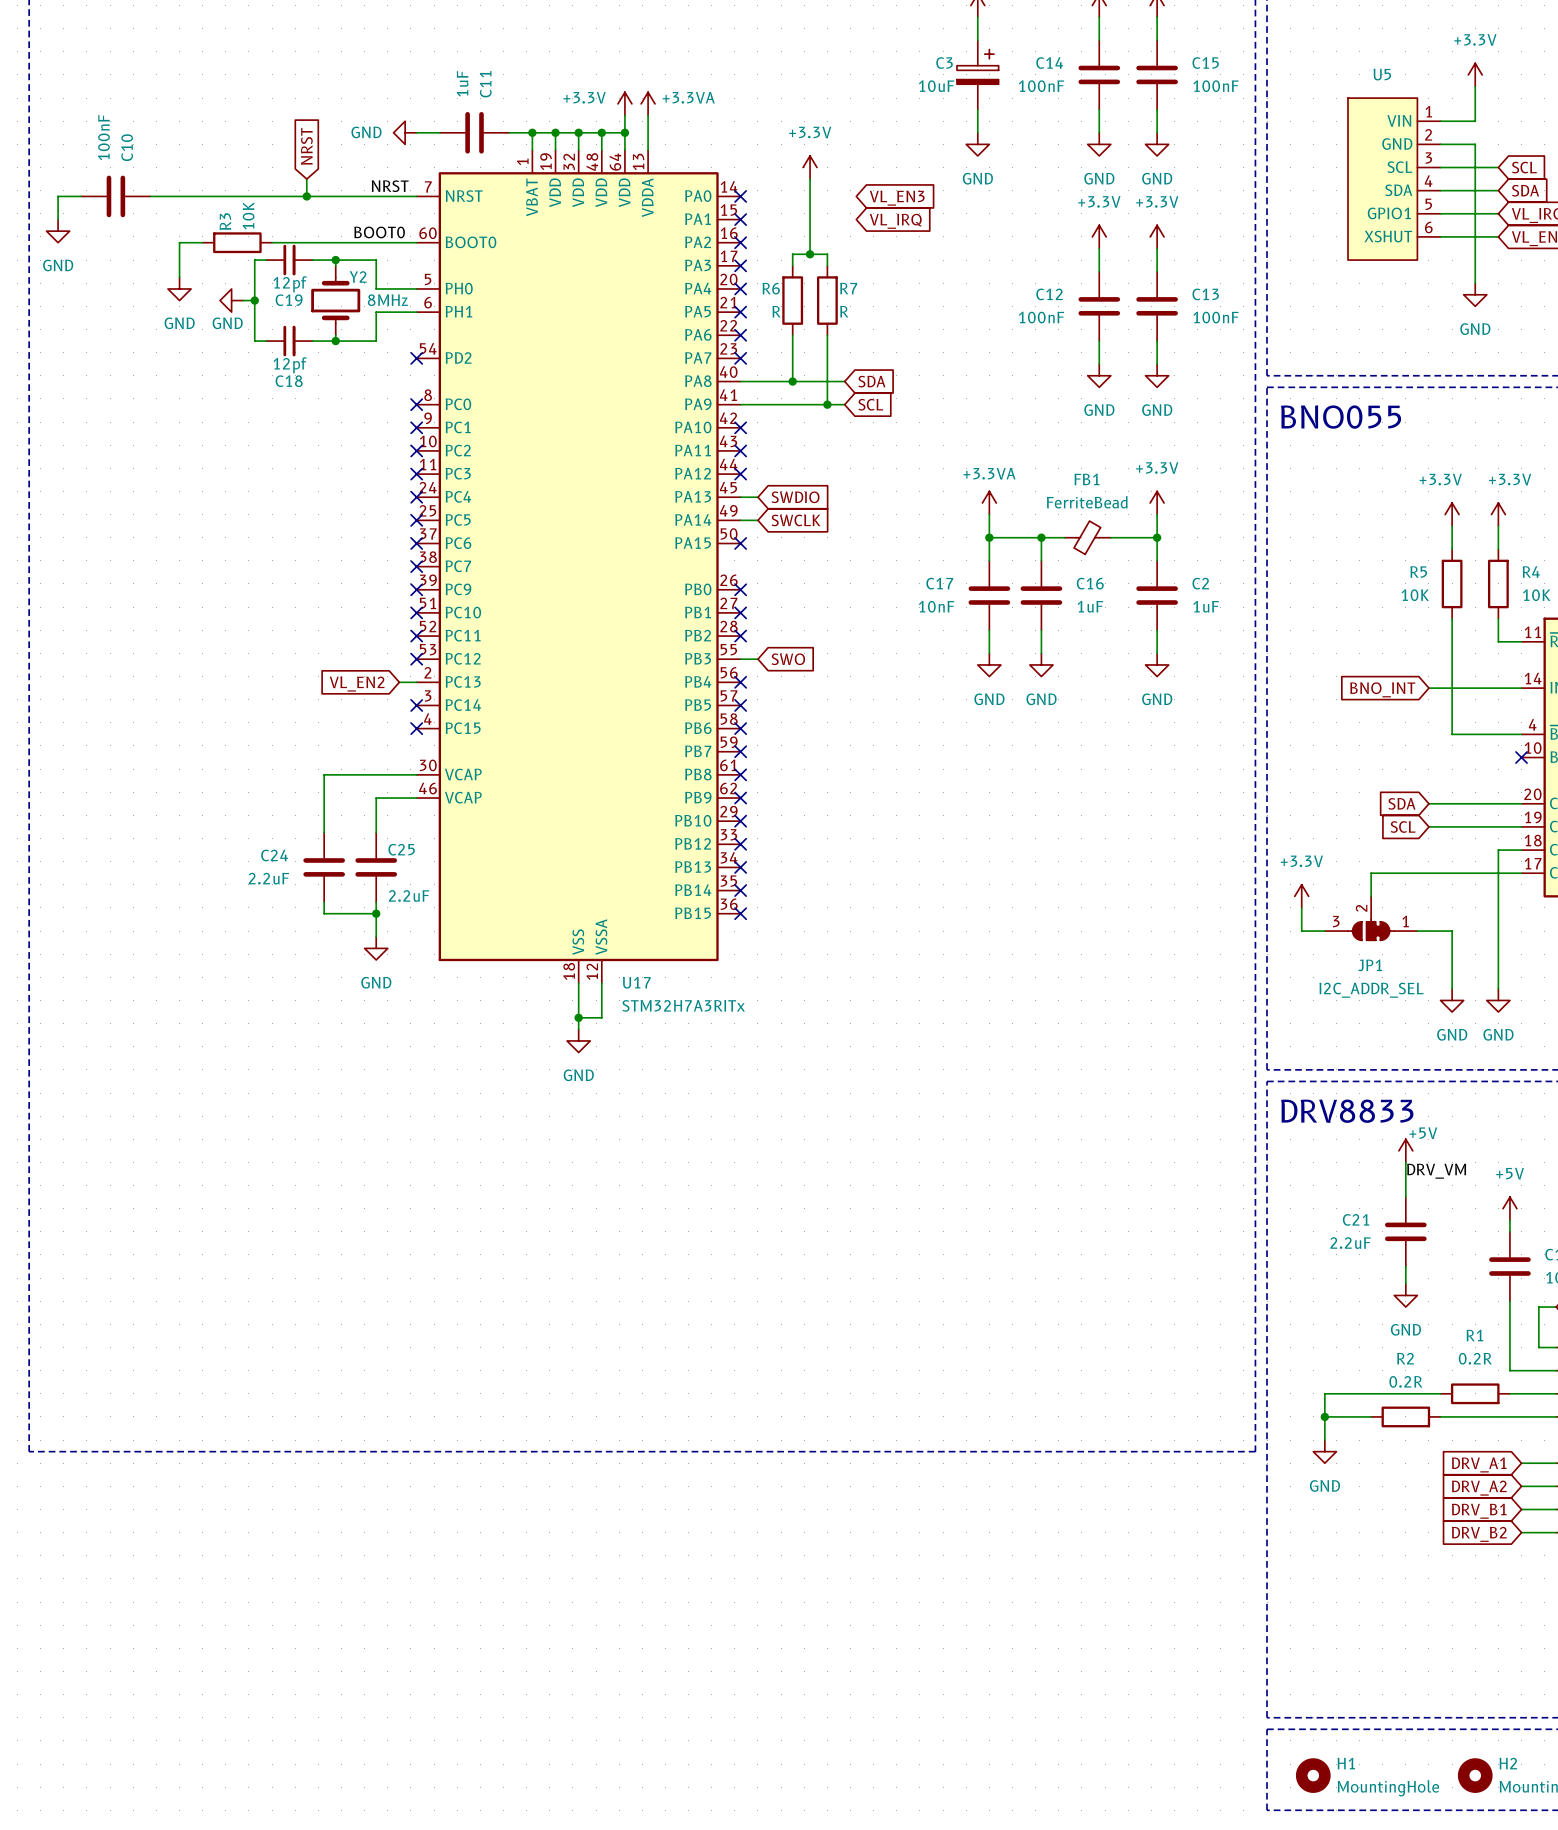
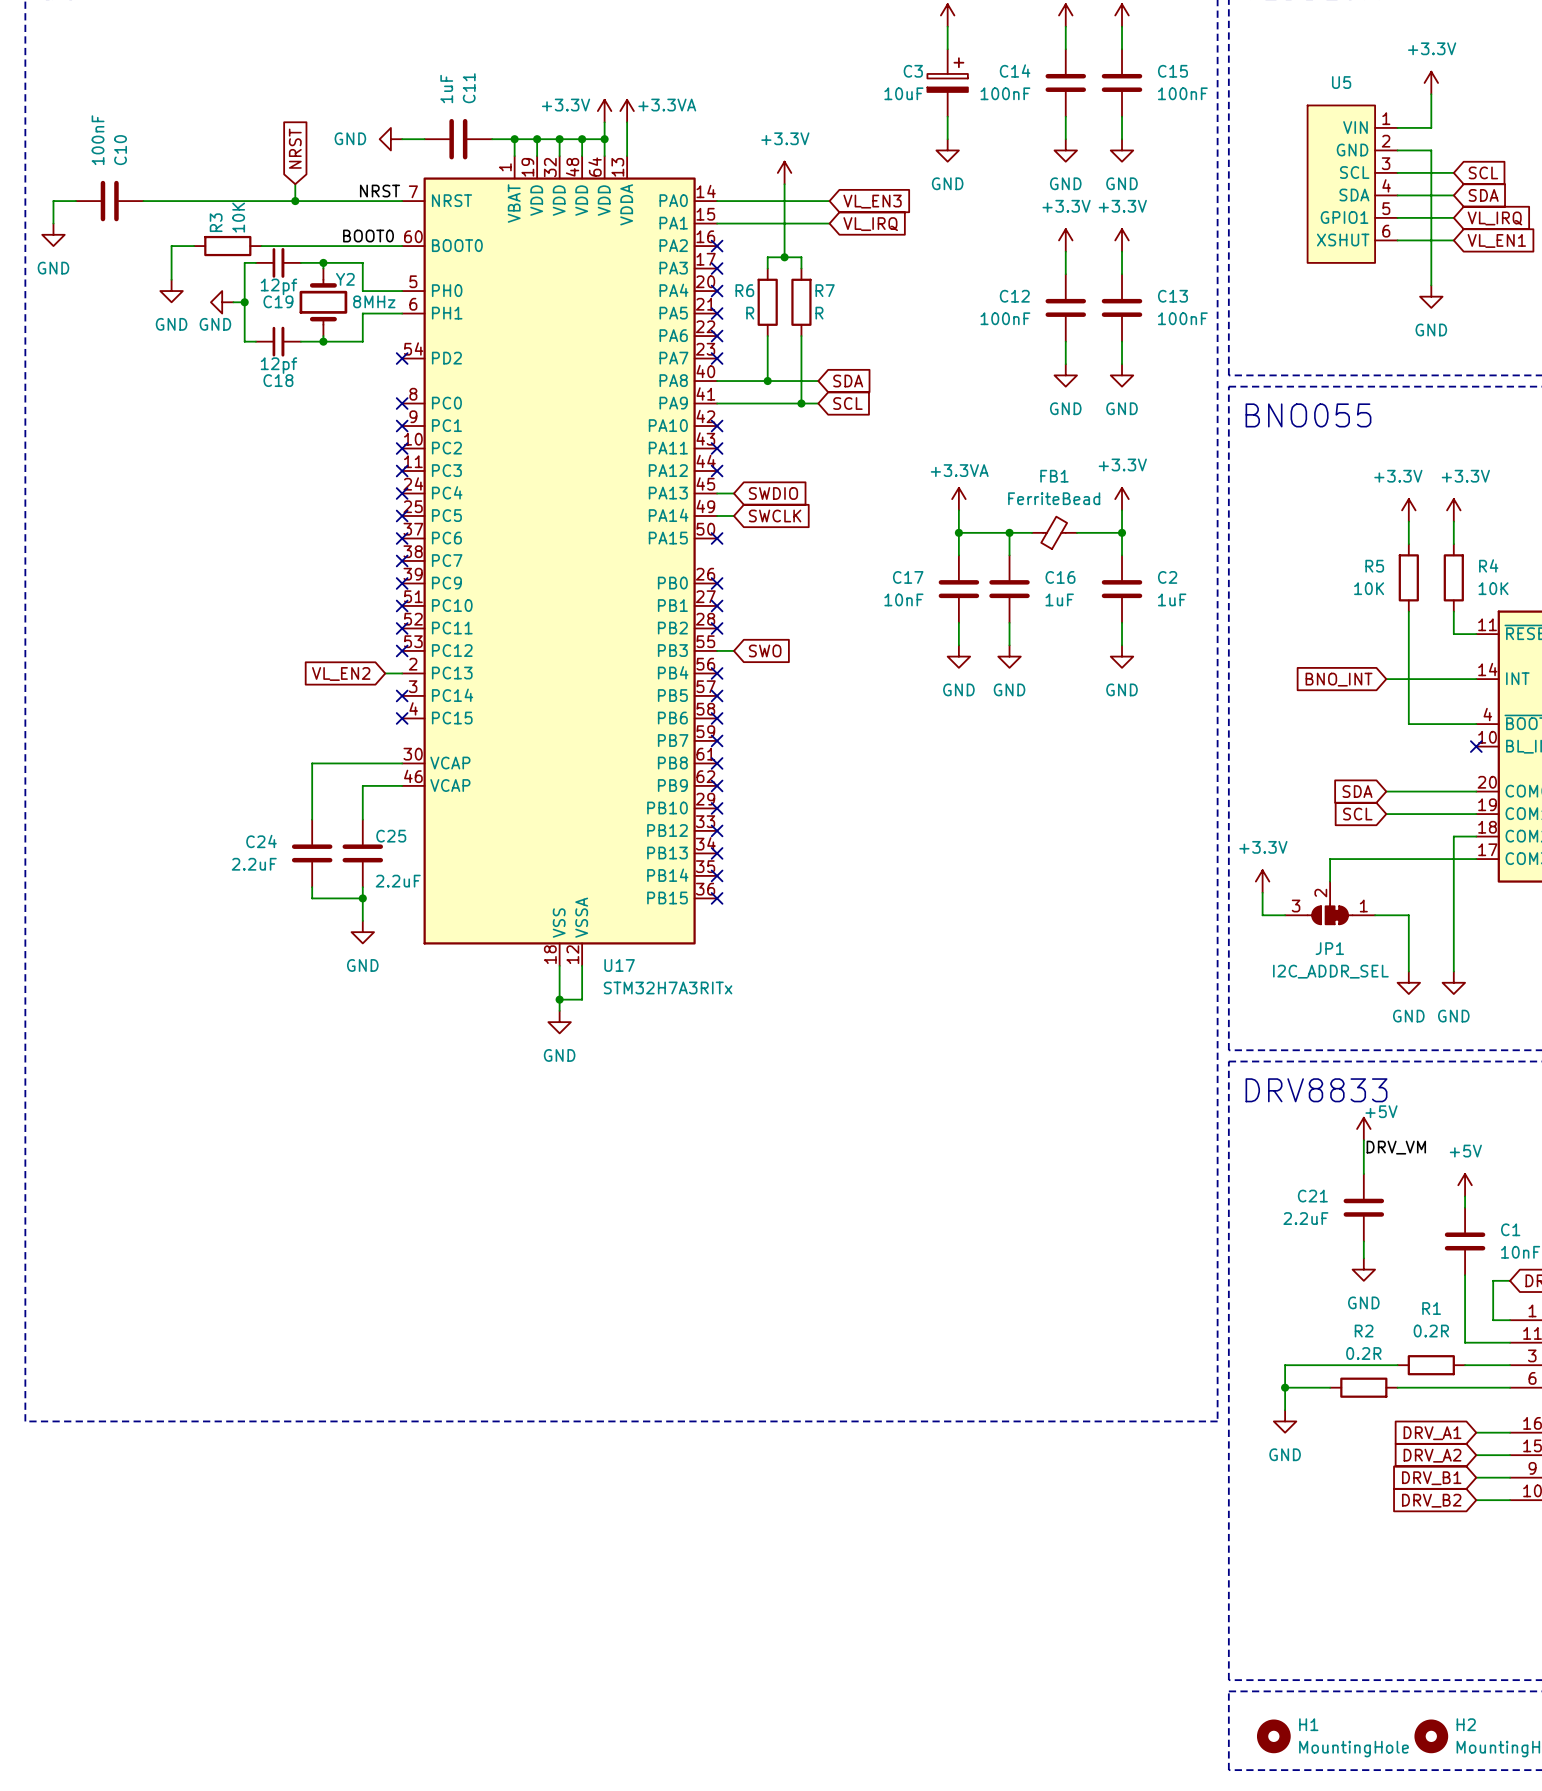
wire: none -> (717, 201) (829, 201)
no-connect mark: (740, 196) -> none
wire: none -> (717, 223) (829, 223)
no-connect mark: (740, 219) -> none

